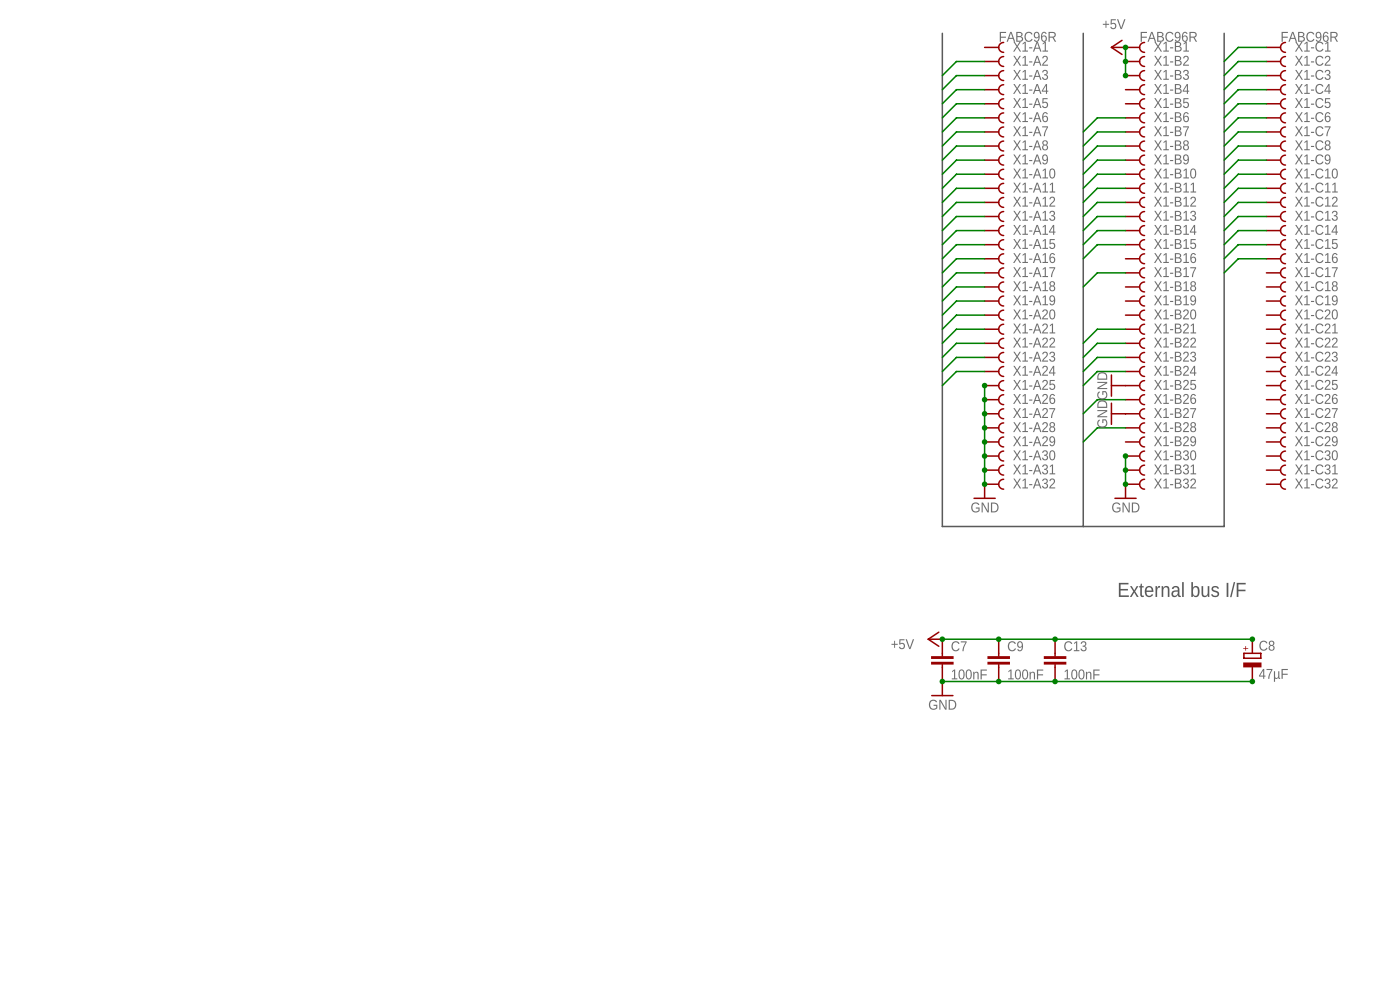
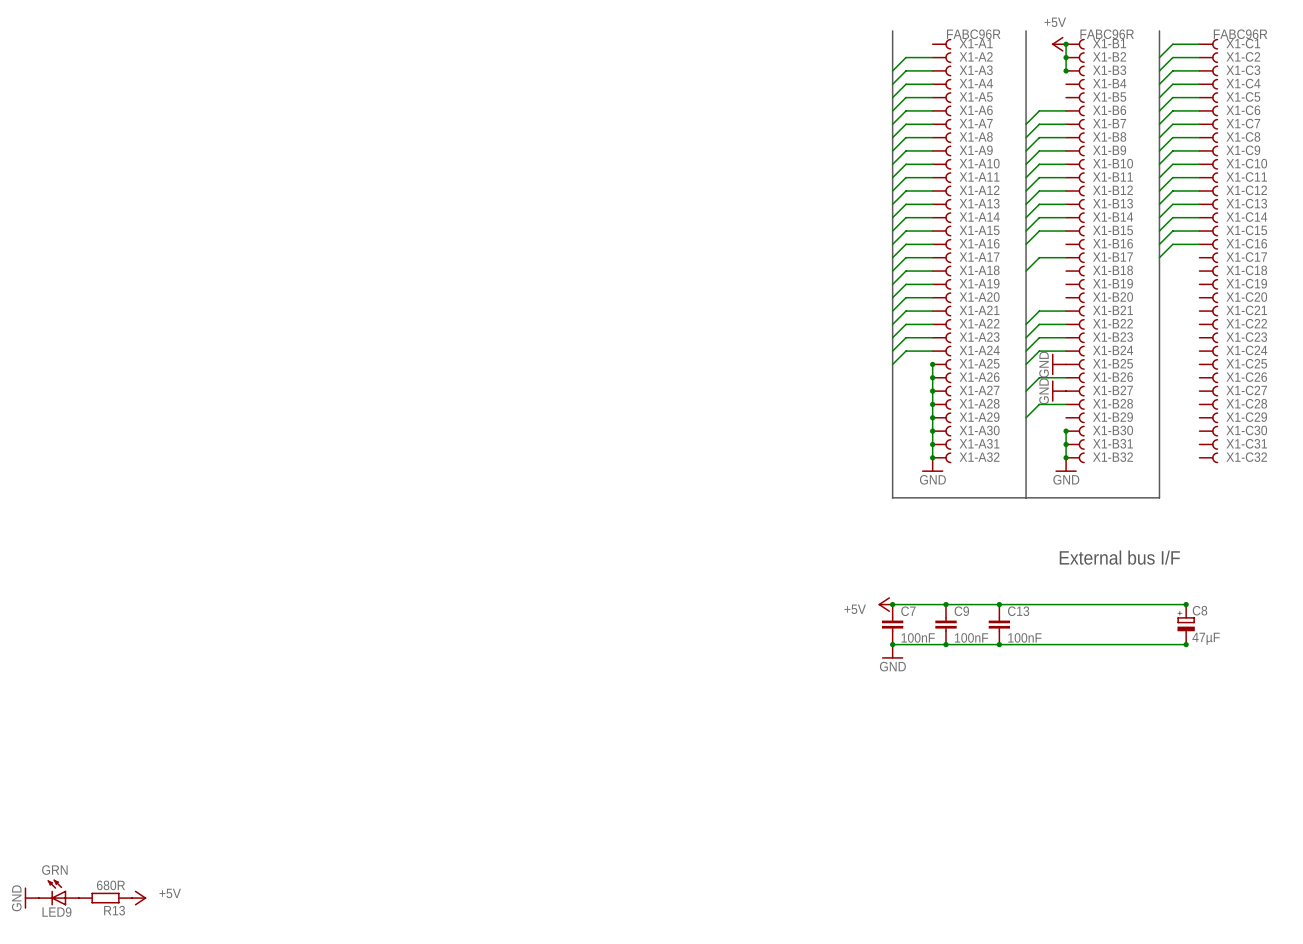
LED9: none -> GRN (58, 892)
power symbol: none -> GND (31, 898)
R13: none -> 680R (105, 898)
power symbol: none -> +5V (139, 898)

